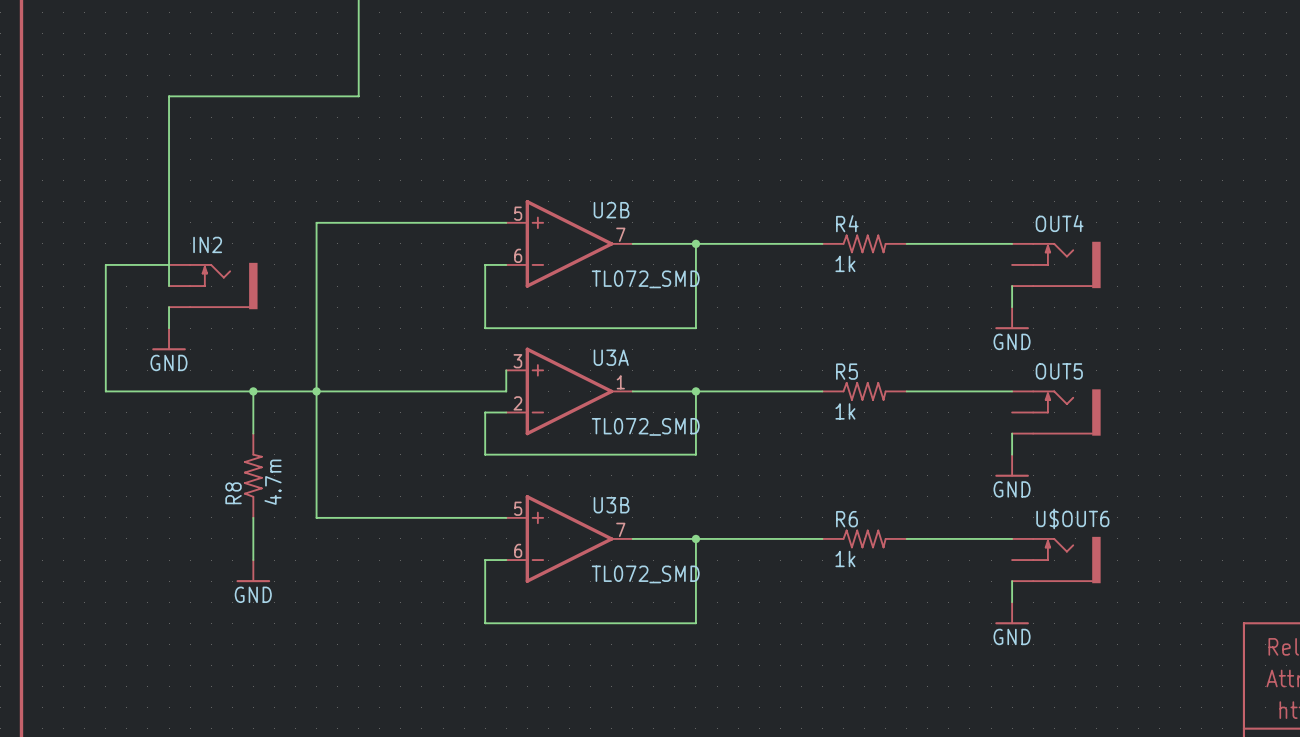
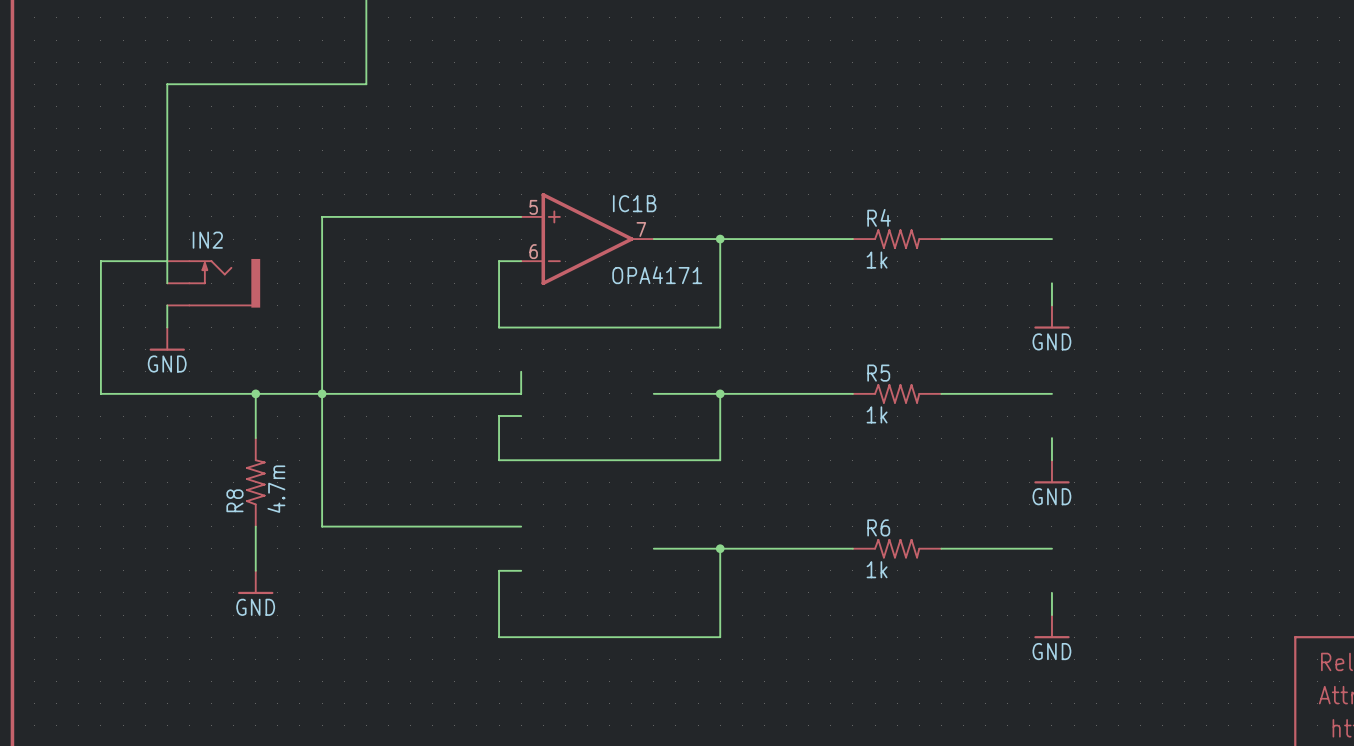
U2B name: U2B (611, 210) -> IC1B (634, 203)
OUT4: (1056, 264) -> none
U2B value: TL072_SMD (645, 279) -> OPA4171 (657, 275)
U3A: TL072_SMD (569, 391) -> none
OUT5: (1056, 412) -> none
U3B: TL072_SMD (569, 538) -> none
U$OUT6: (1056, 560) -> none

